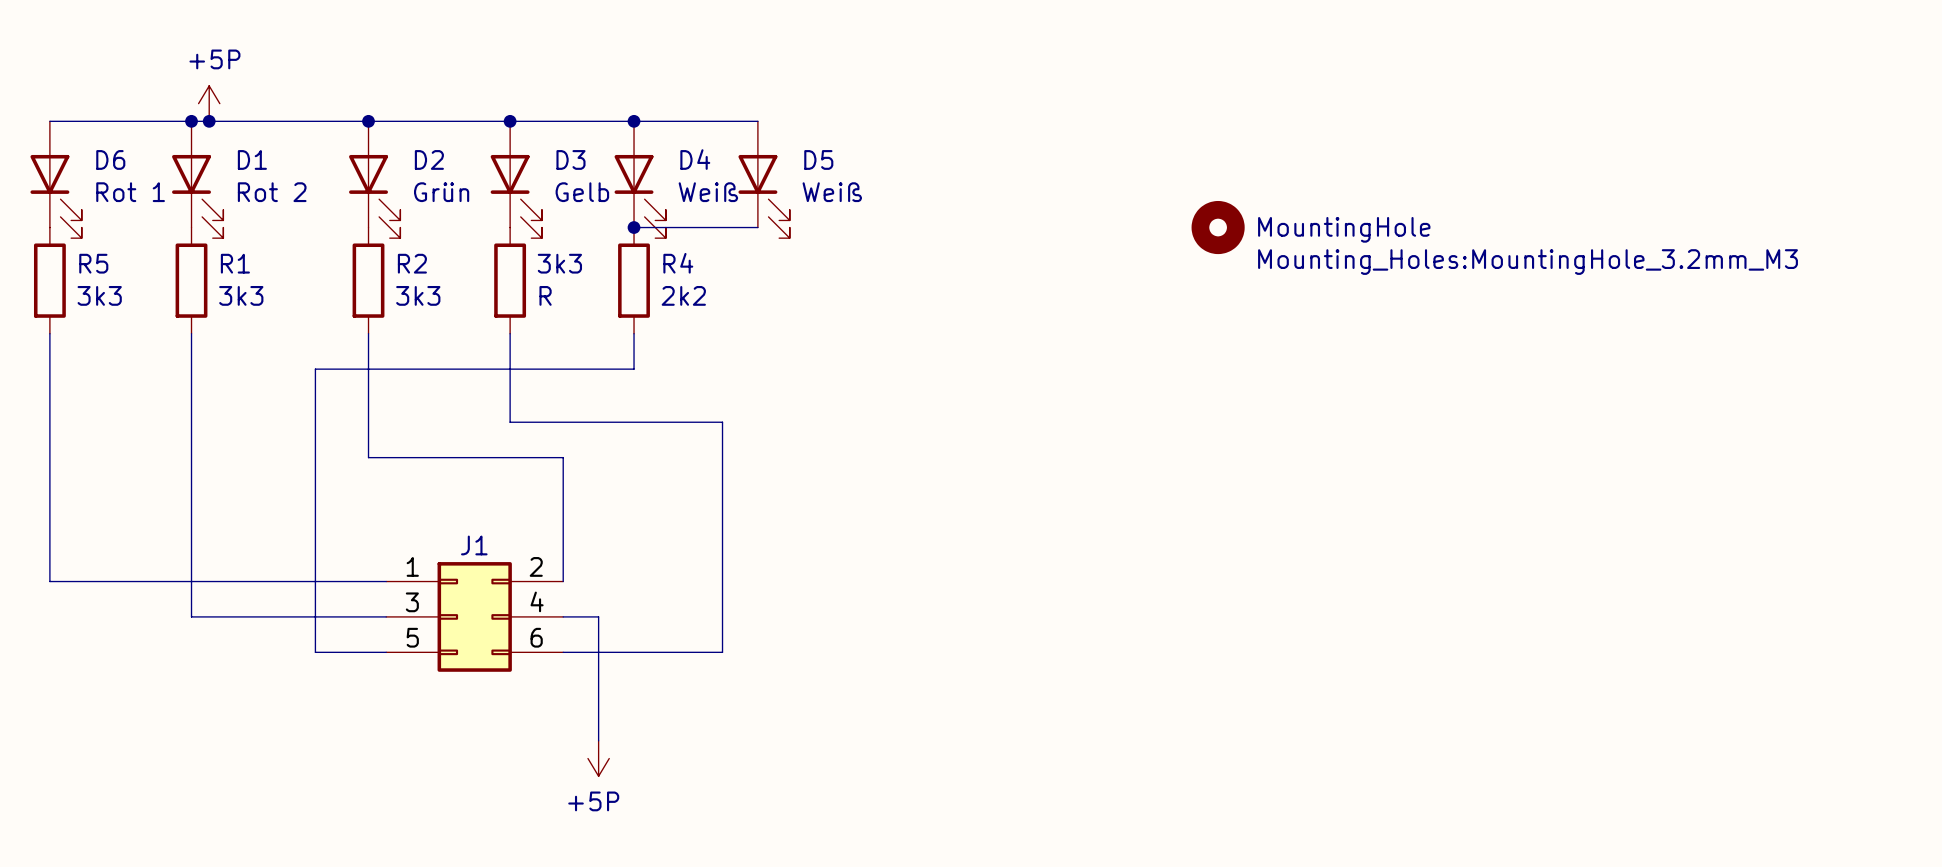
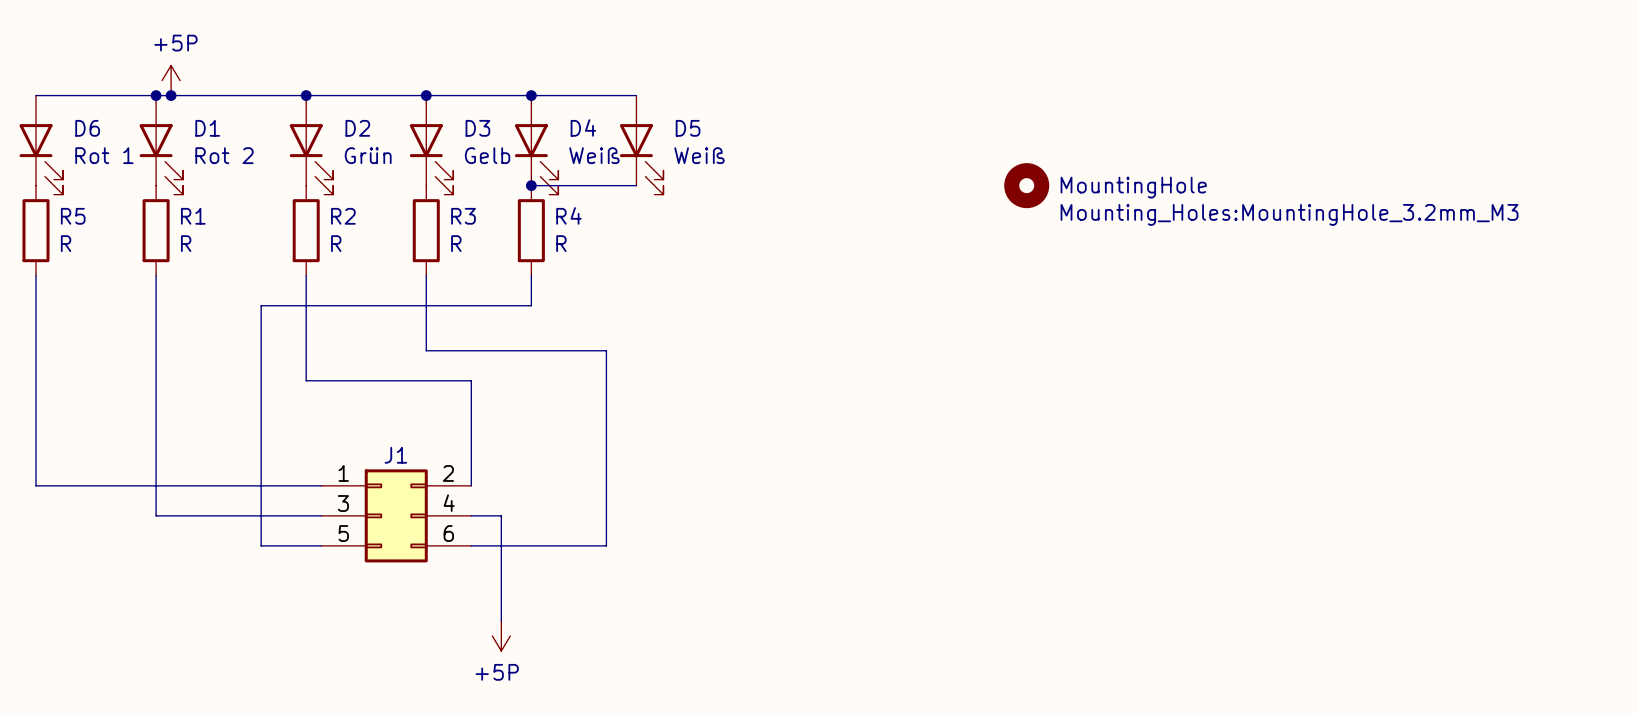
3k3 name: 3k3 (559, 263) -> R3 (463, 216)
R5 value: 3k3 (99, 295) -> R (66, 243)
R1 value: 3k3 (241, 295) -> R (186, 243)
R2 value: 3k3 (418, 295) -> R (336, 243)
R4 value: 2k2 (683, 295) -> R (561, 243)

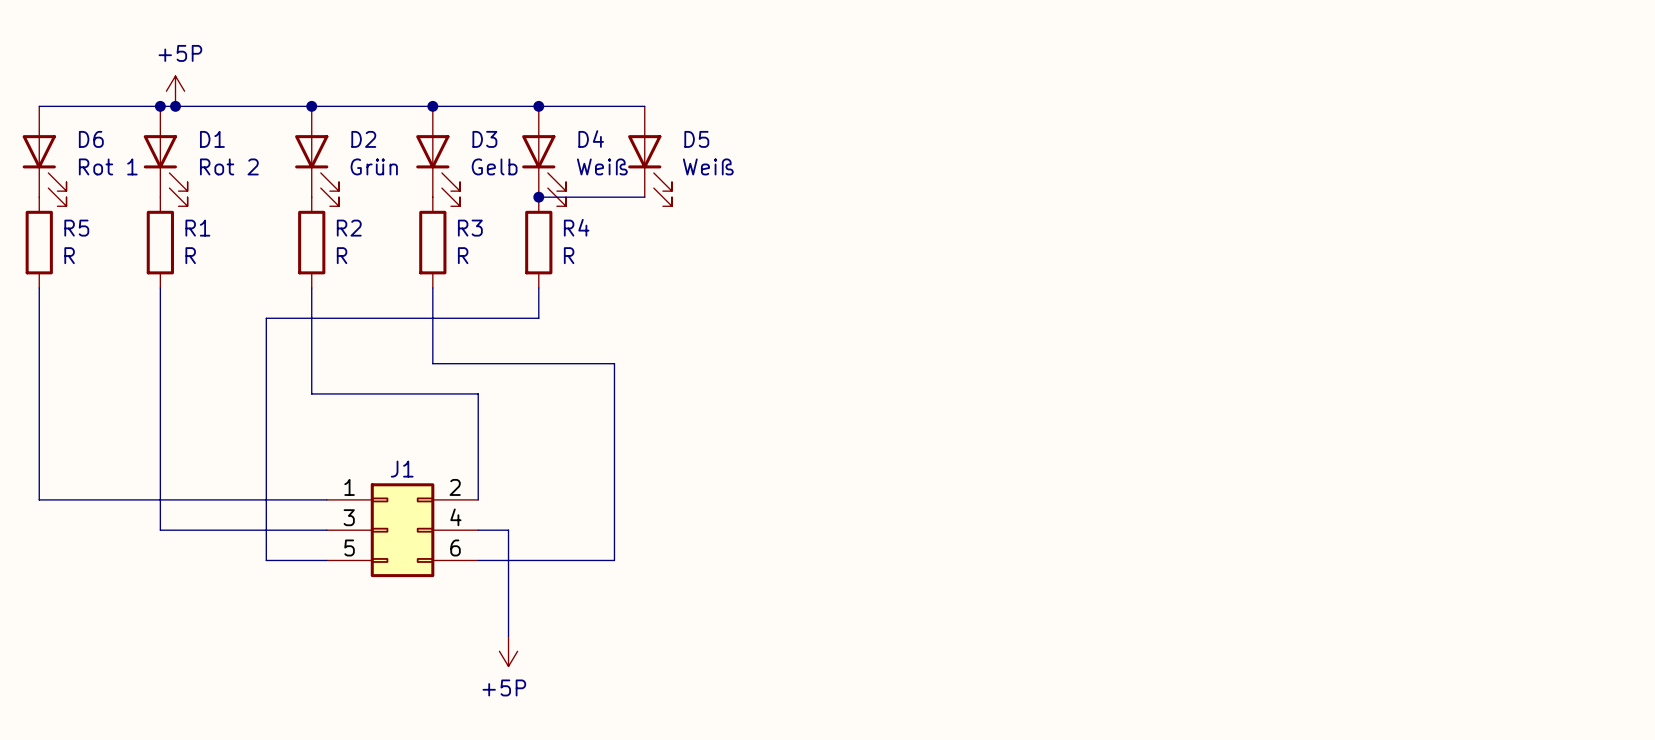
part: MountingHole (1026, 185) -> none

